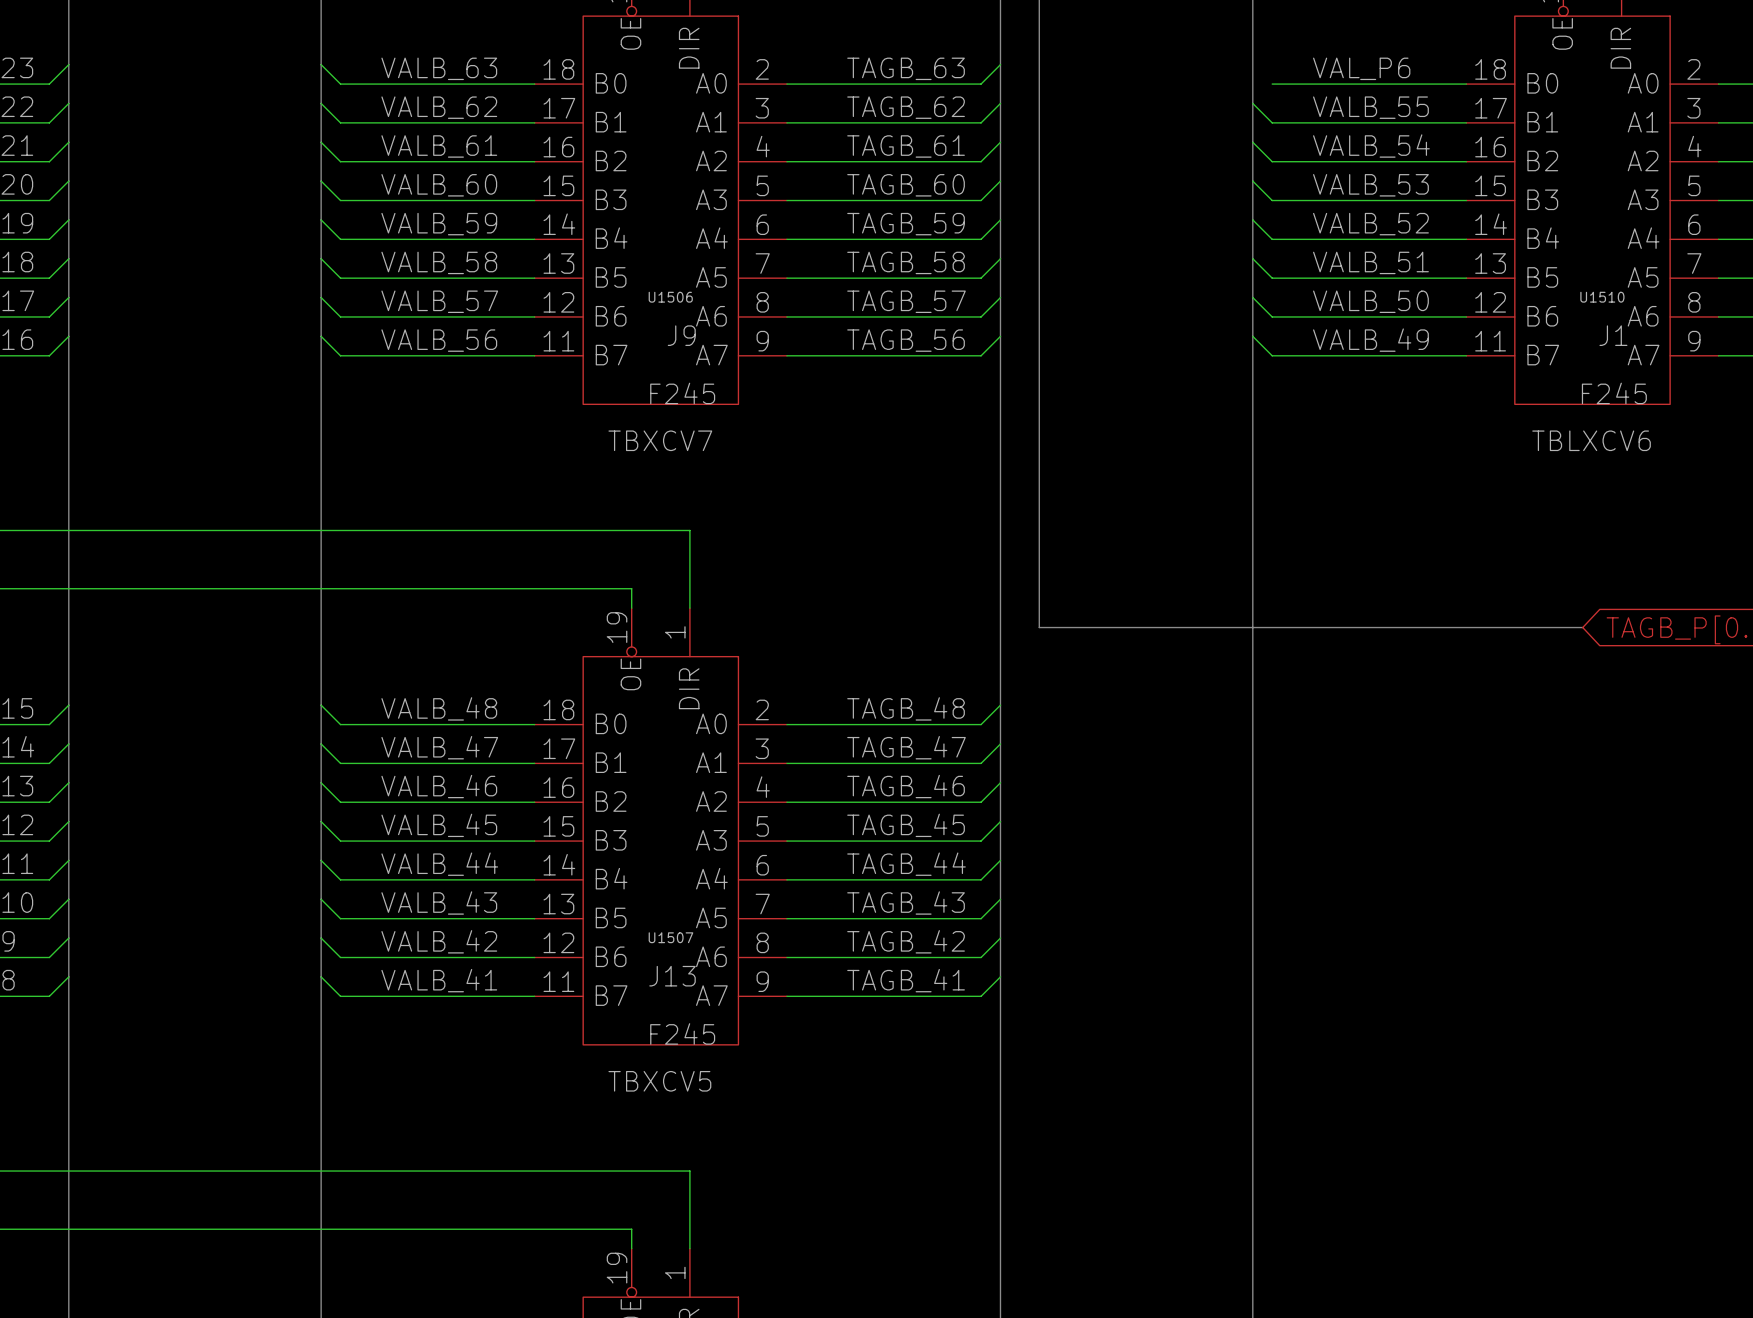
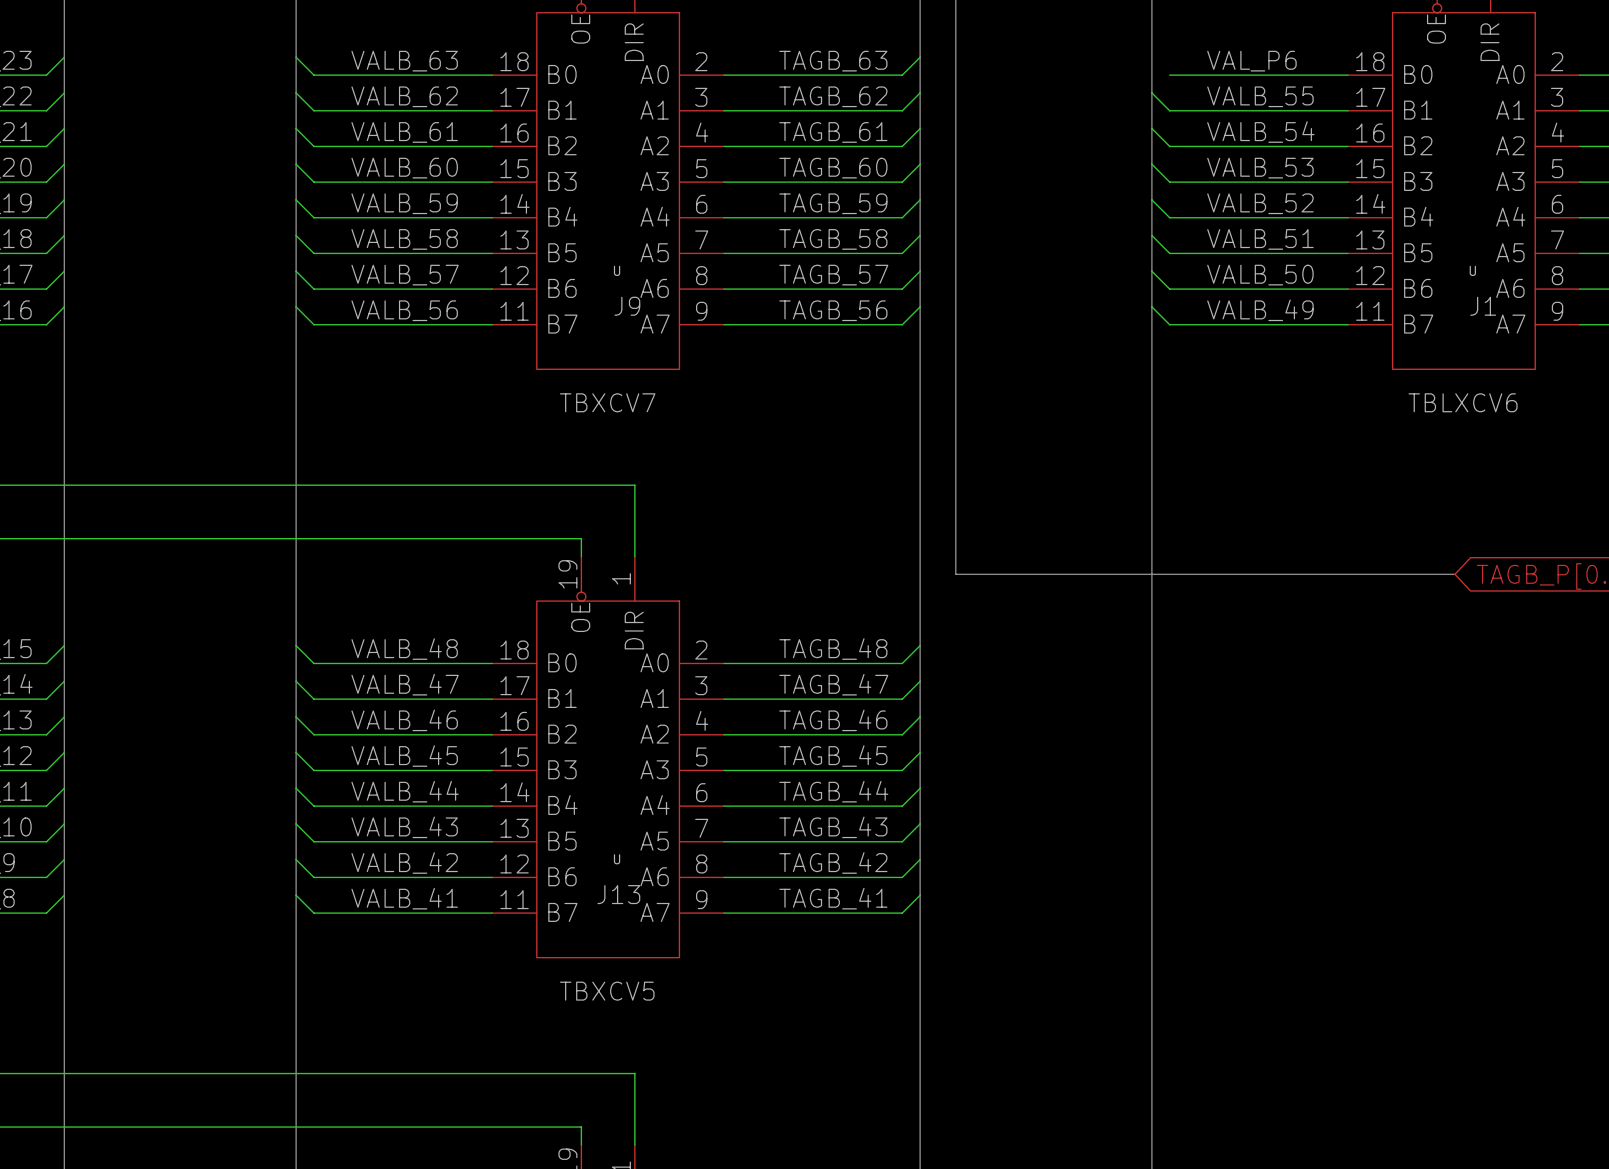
U1506 name: U1506 (670, 297) -> U (617, 270)
U1510 name: U1510 (1602, 297) -> U (1472, 270)
U1506 value: F245 (682, 393) -> none
U1510 value: F245 (1614, 393) -> none
U1507 name: U1507 (670, 937) -> U (617, 859)
U1507 value: F245 (682, 1033) -> none

